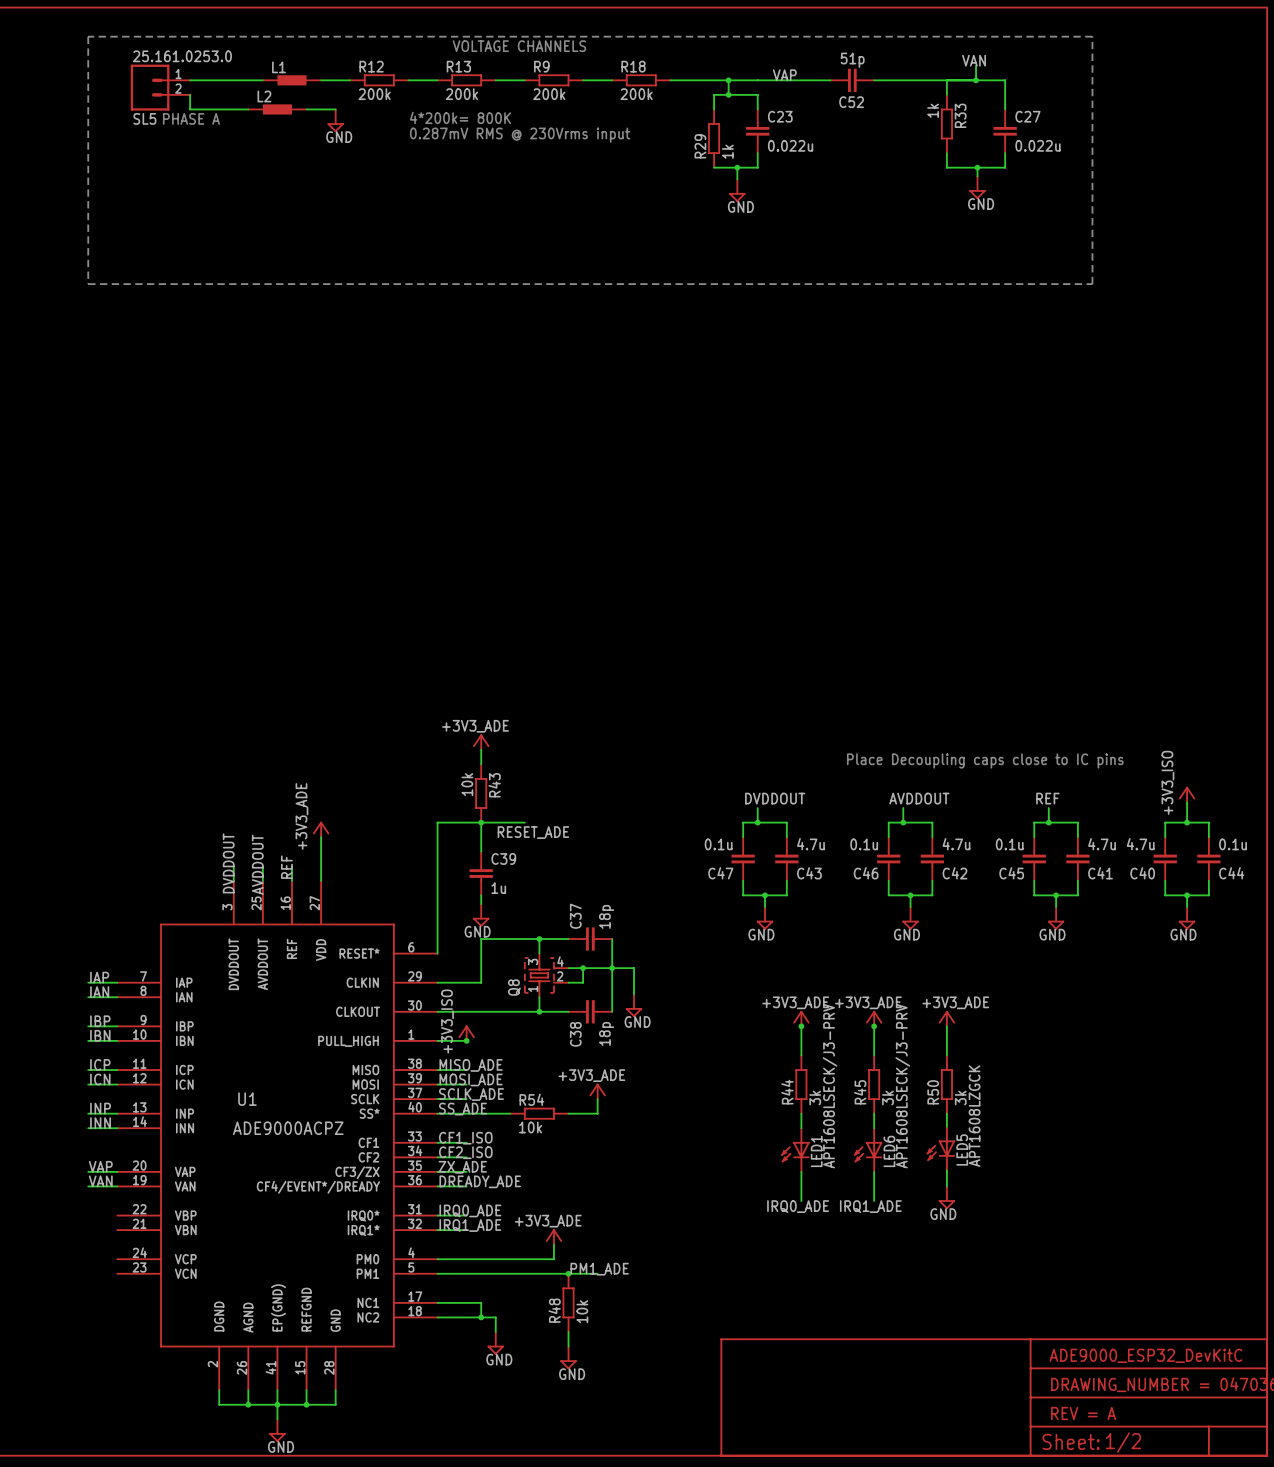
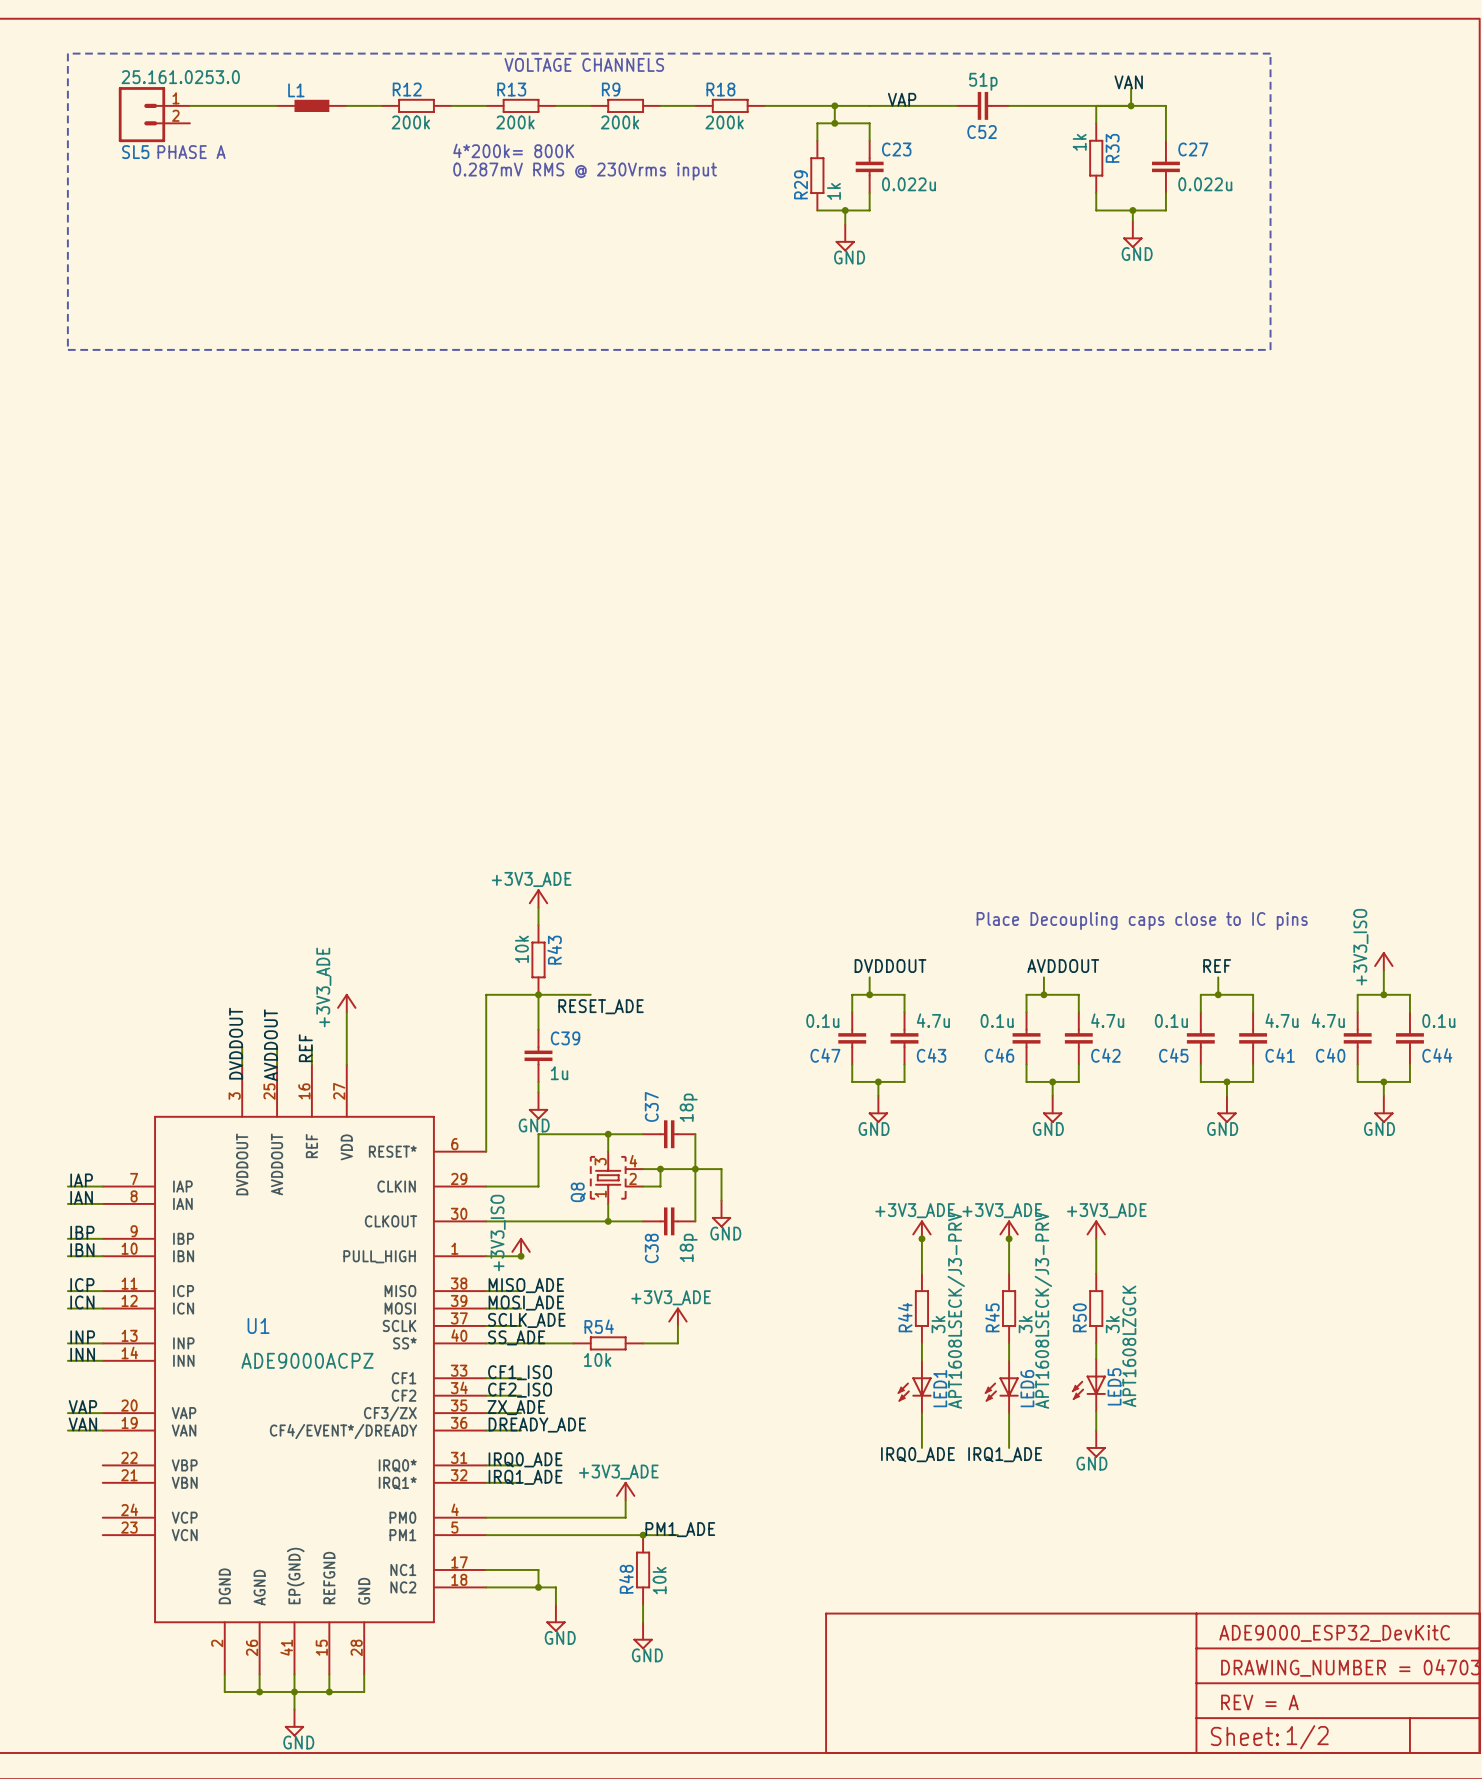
wire: (190, 94) (190, 109) (248, 109) -> none
L2: (277, 109) -> none
wire: (306, 109) (335, 109) -> none
power symbol: GND (335, 120) -> none

